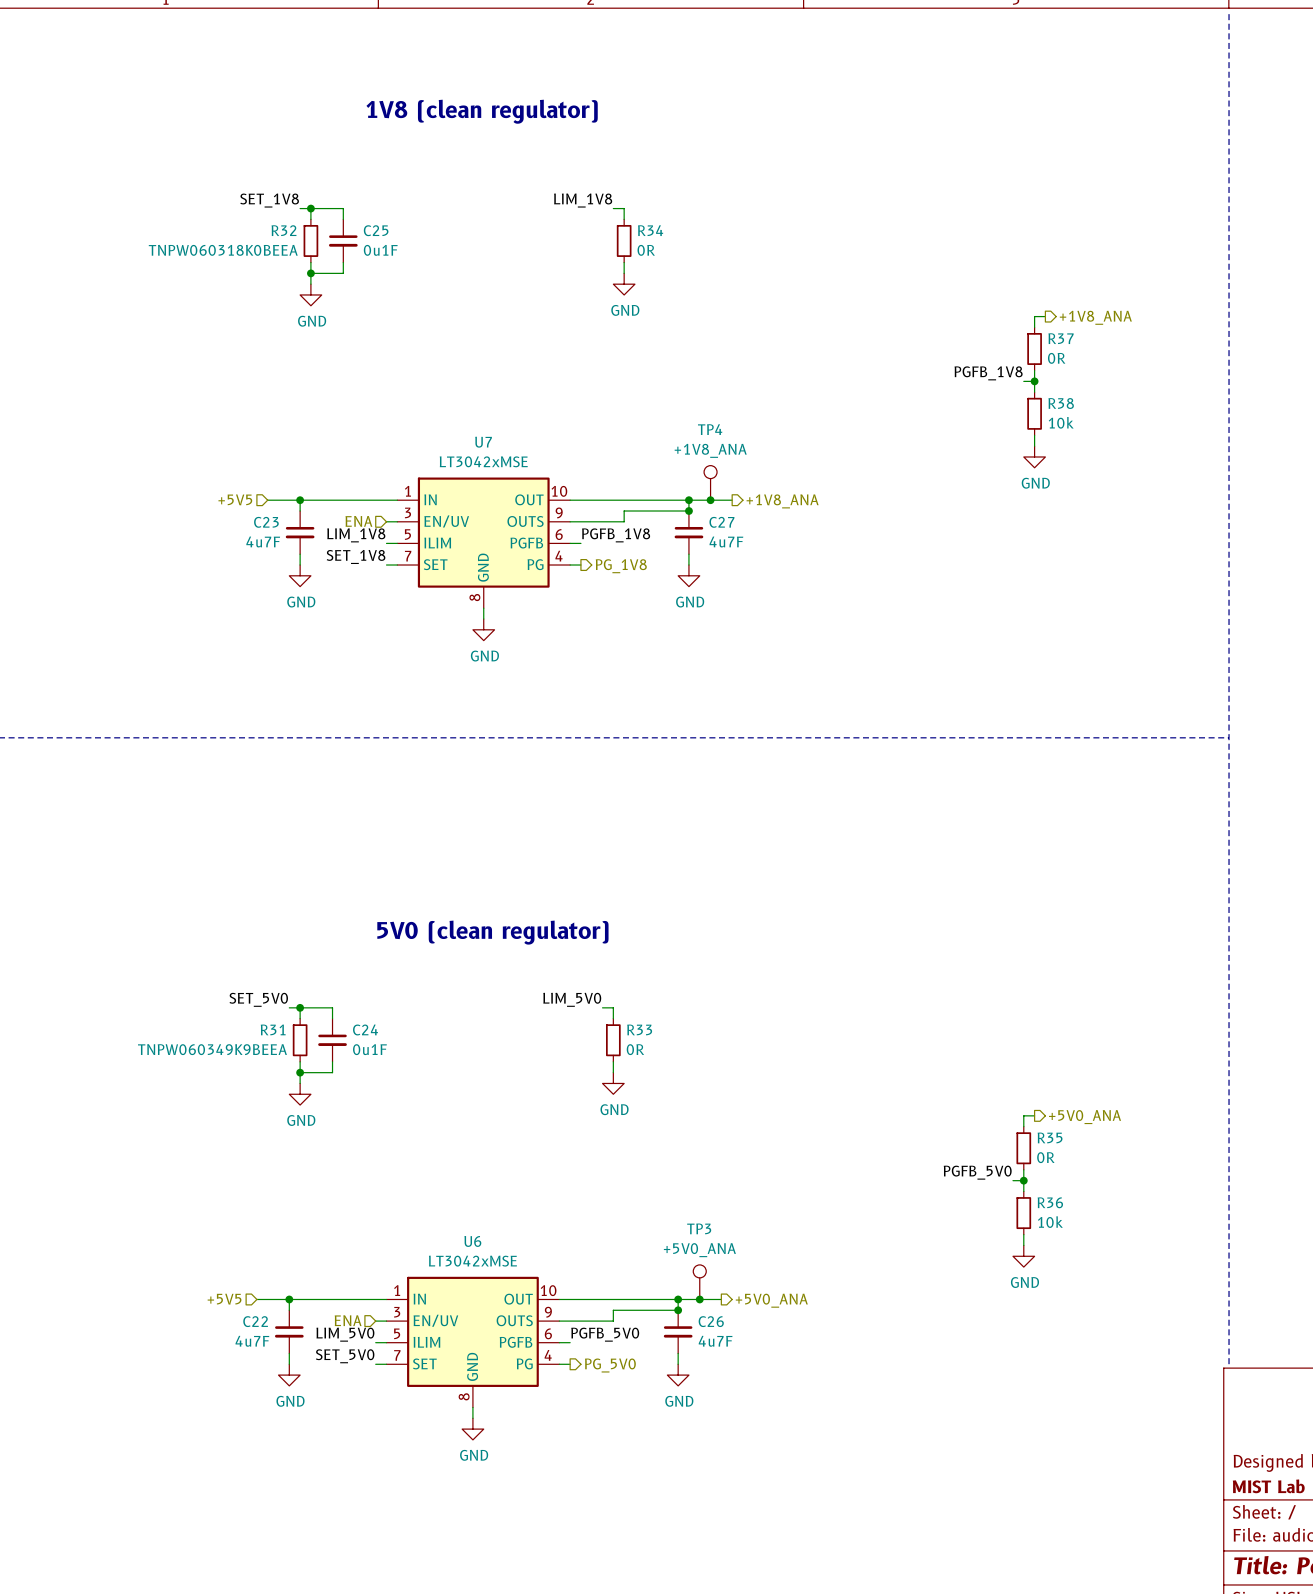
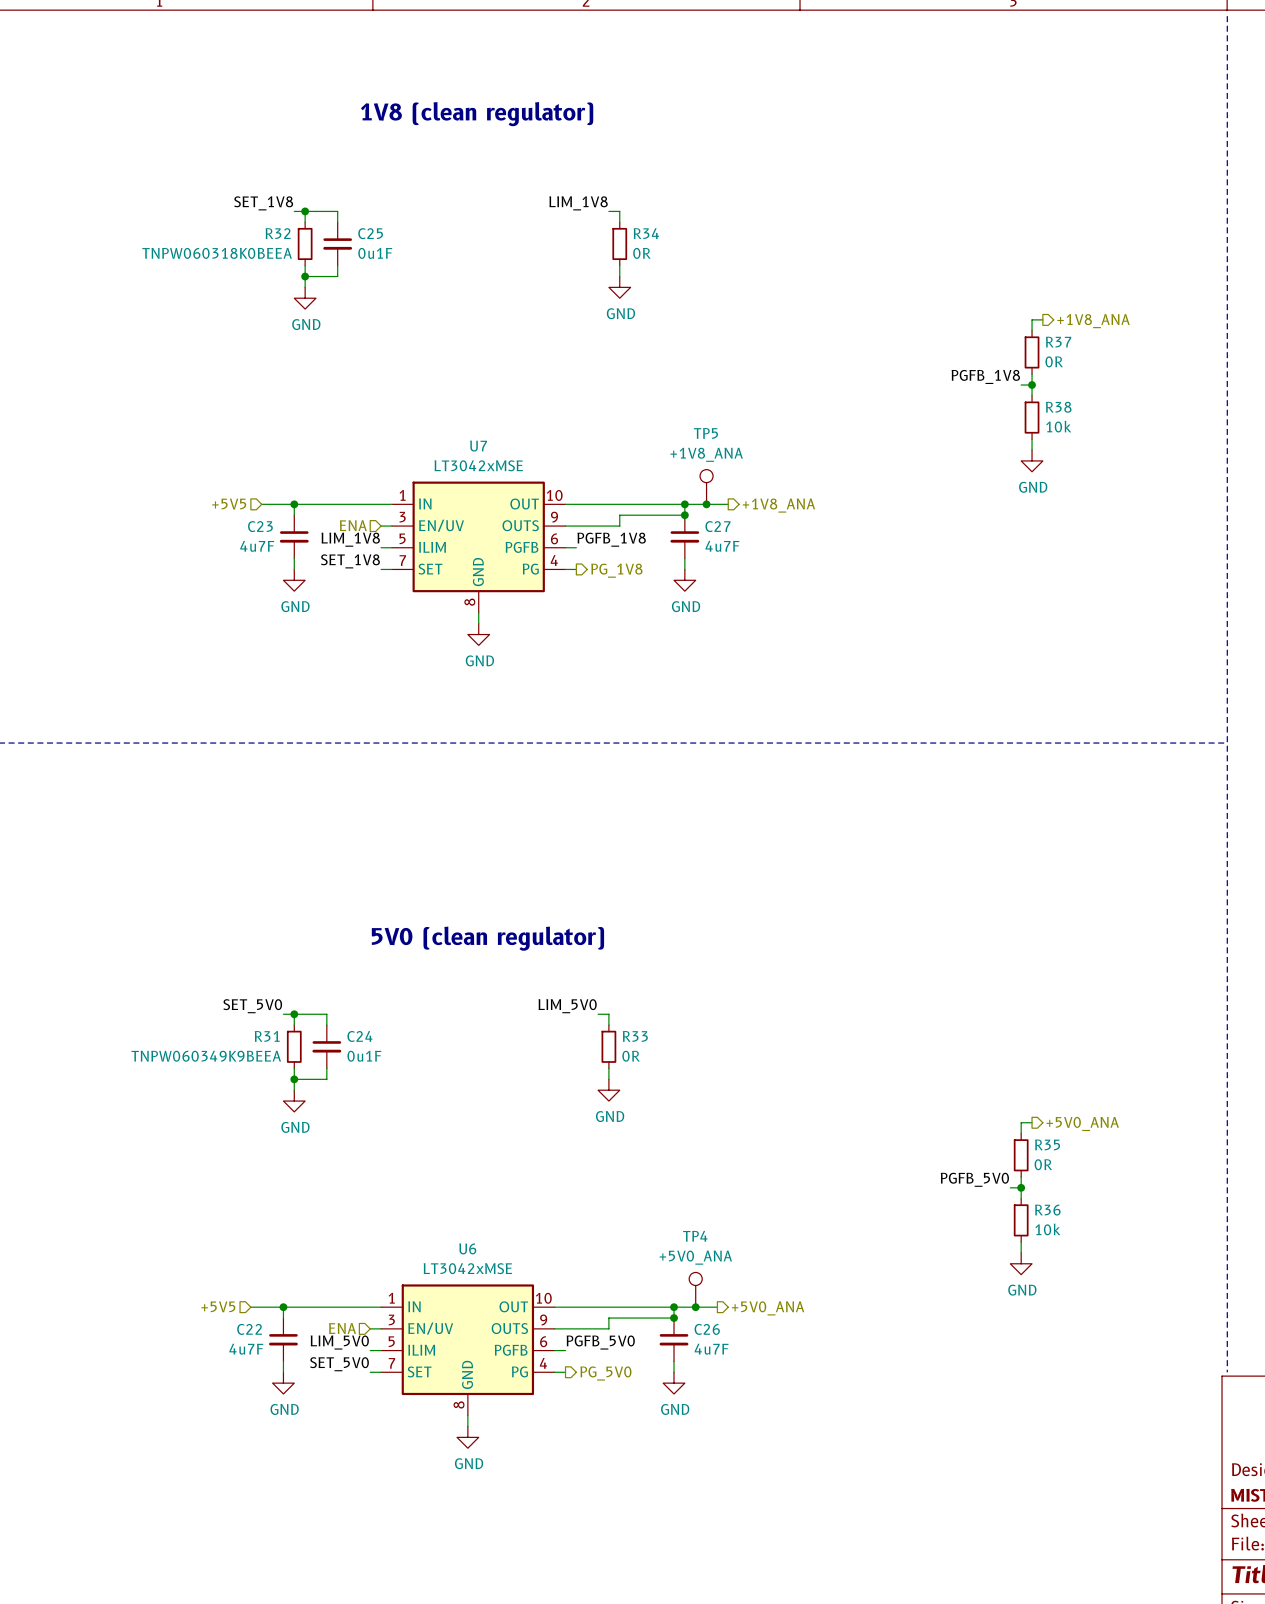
TP4 name: TP4 (710, 429) -> TP5 (705, 433)
TP3 name: TP3 (699, 1228) -> TP4 (695, 1236)

